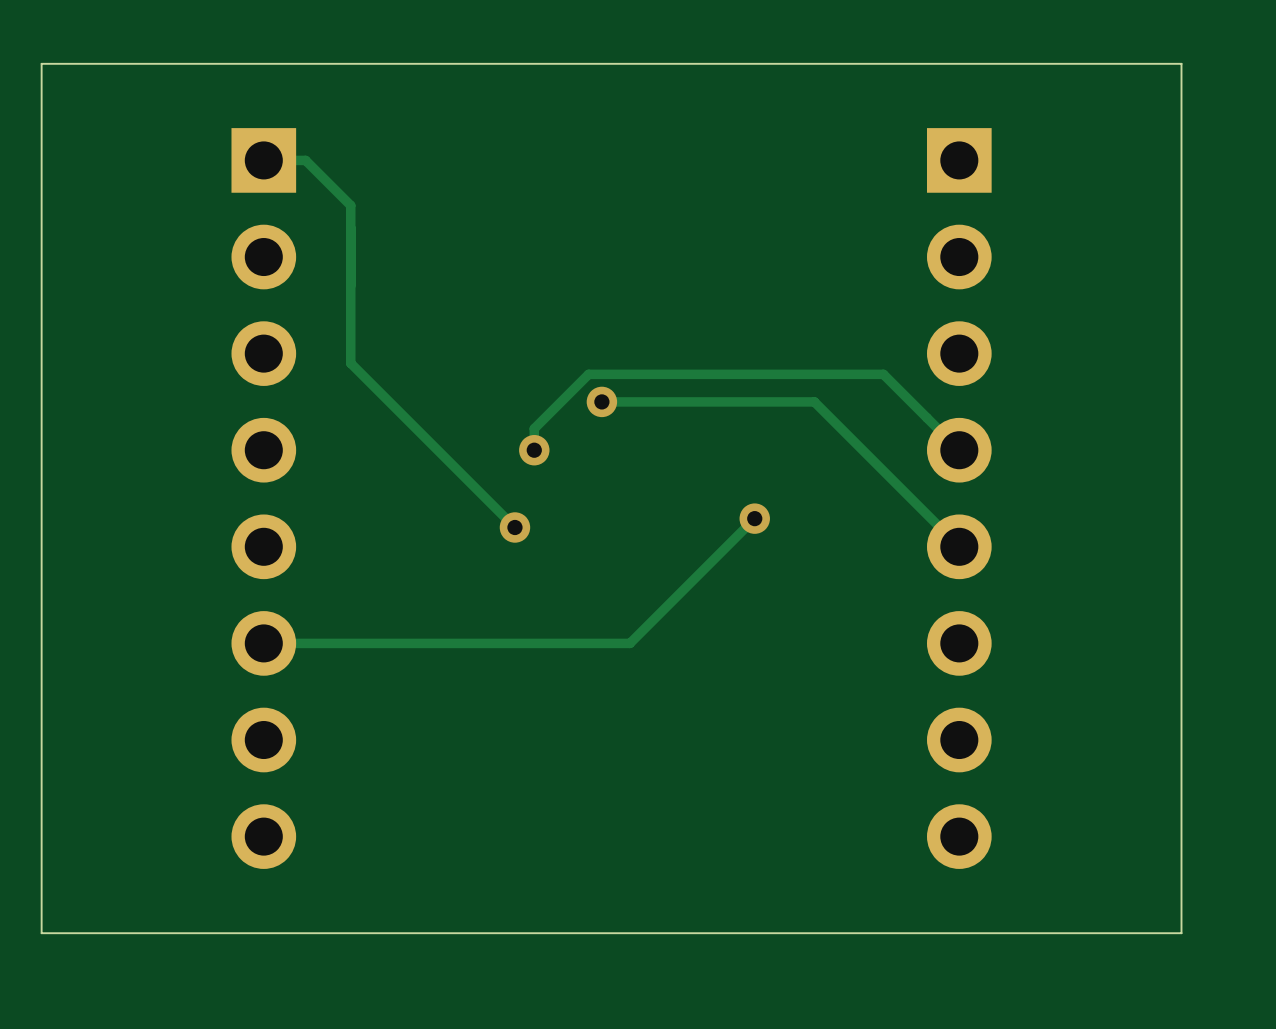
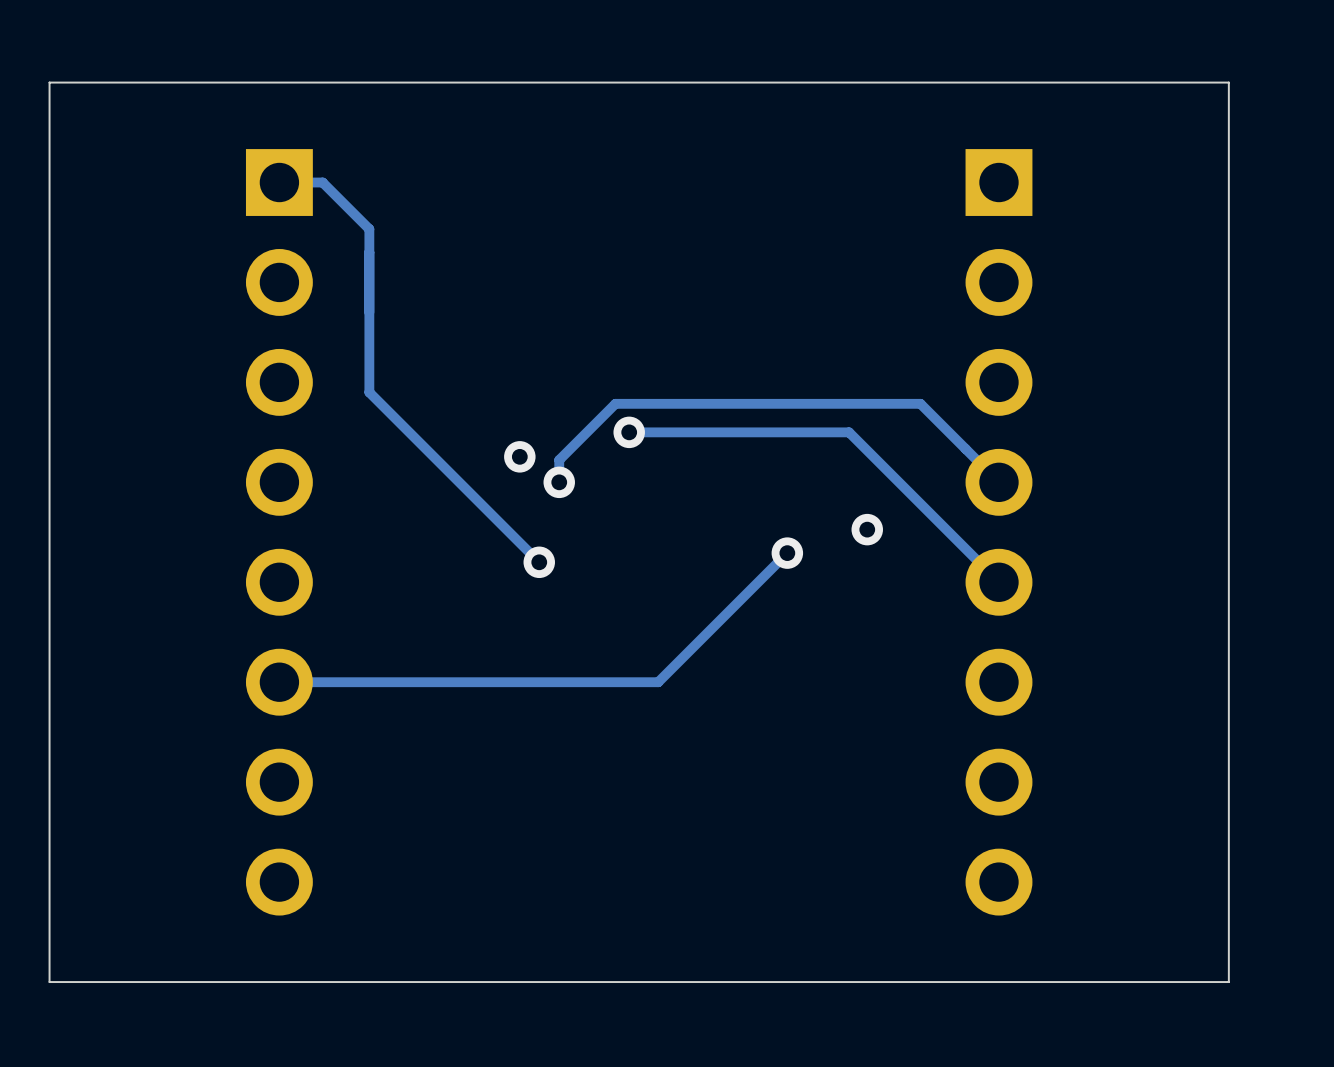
via: none -> (519, 456)
via: none -> (867, 529)

